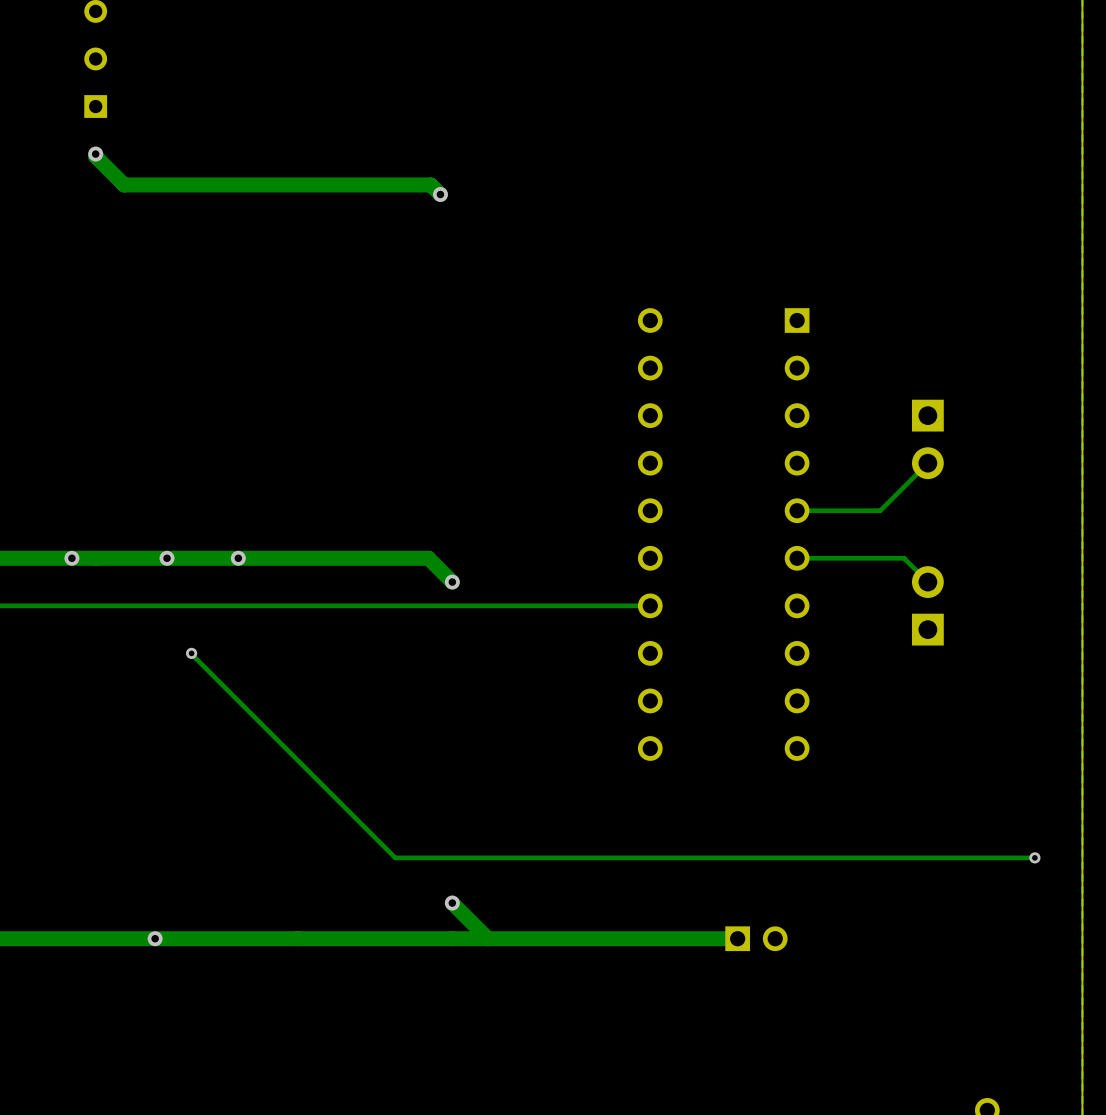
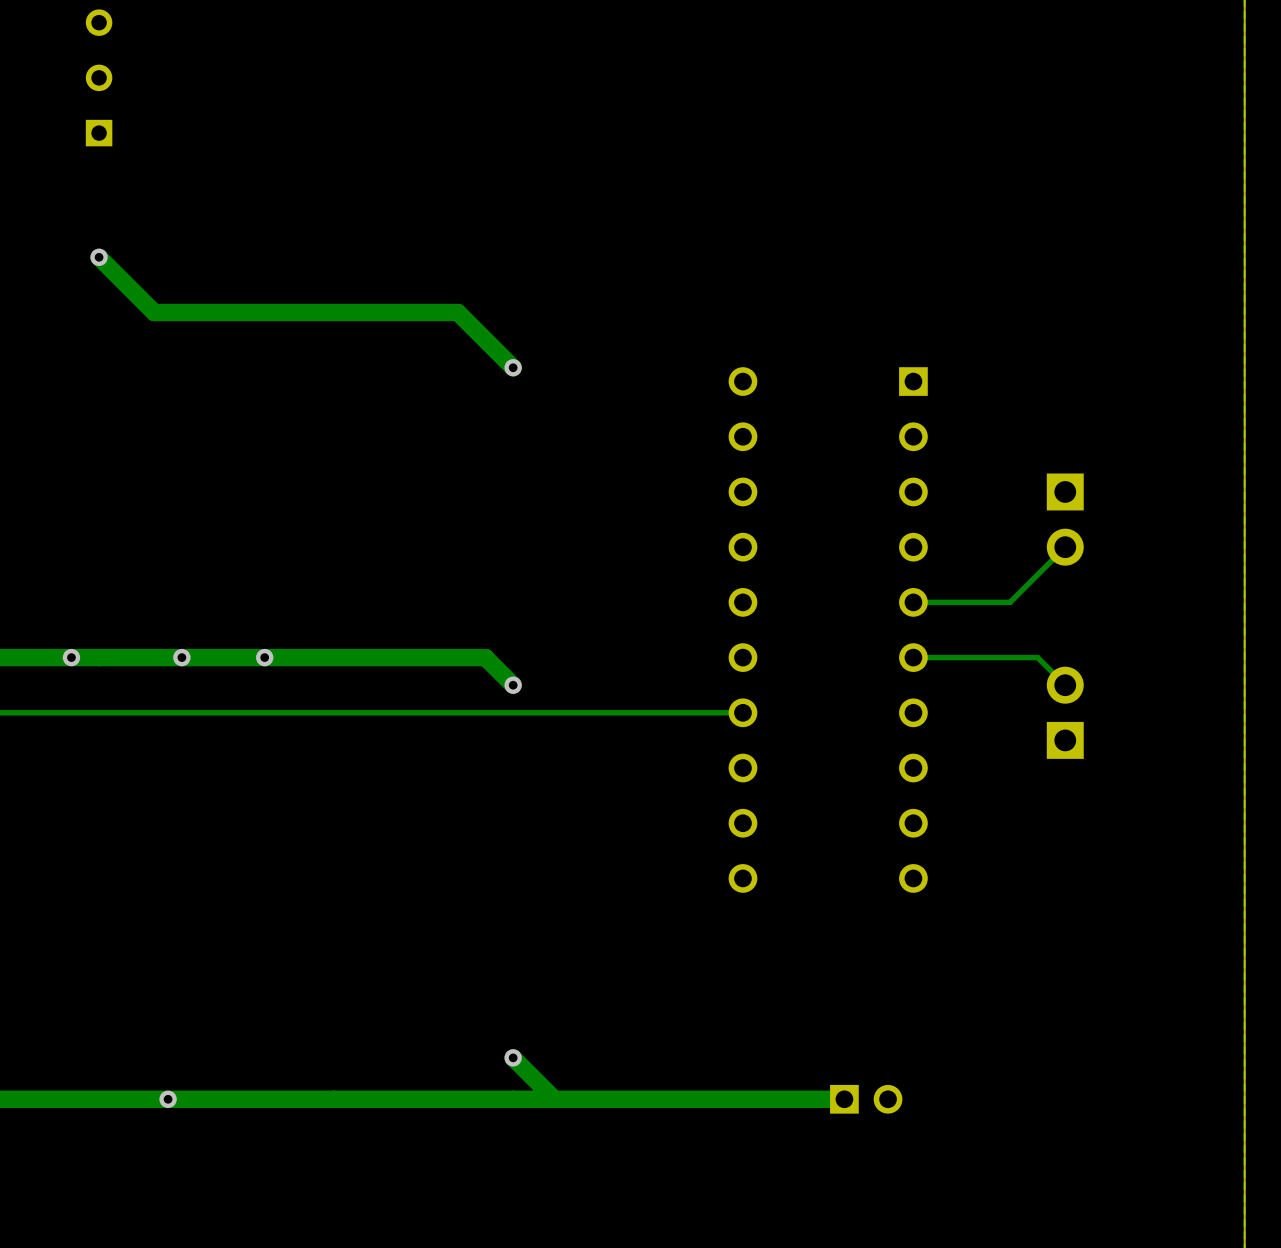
track: (95, 154) (95, 156) (124, 184) (430, 184) (440, 194) -> none
via position: (95, 154) -> (99, 257)
via: (440, 194) -> none
track: none -> (99, 257) (154, 312) (457, 312) (513, 367)
via: none -> (513, 367)
track: (191, 653) (395, 857) (1034, 857) -> none
via: (191, 653) -> none
via: (1034, 857) -> none

